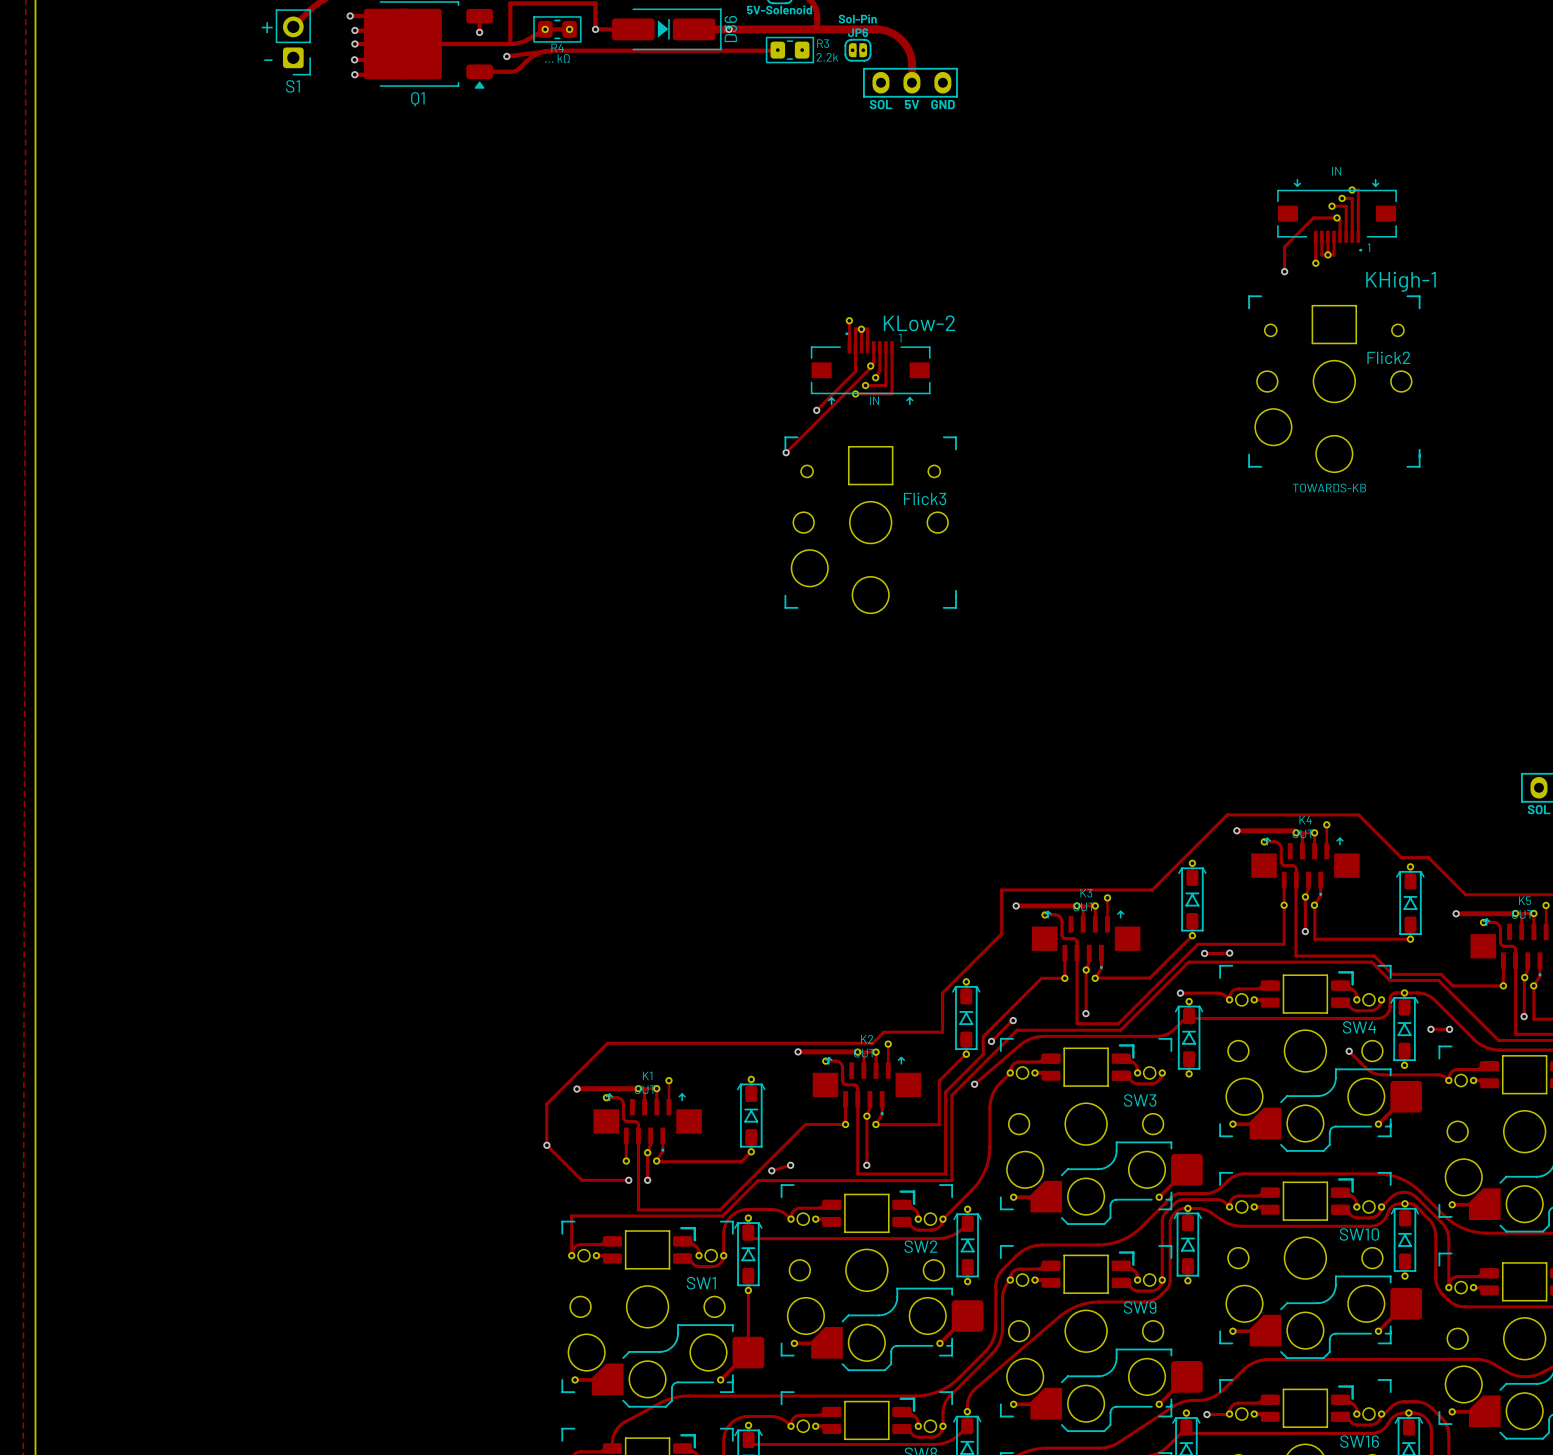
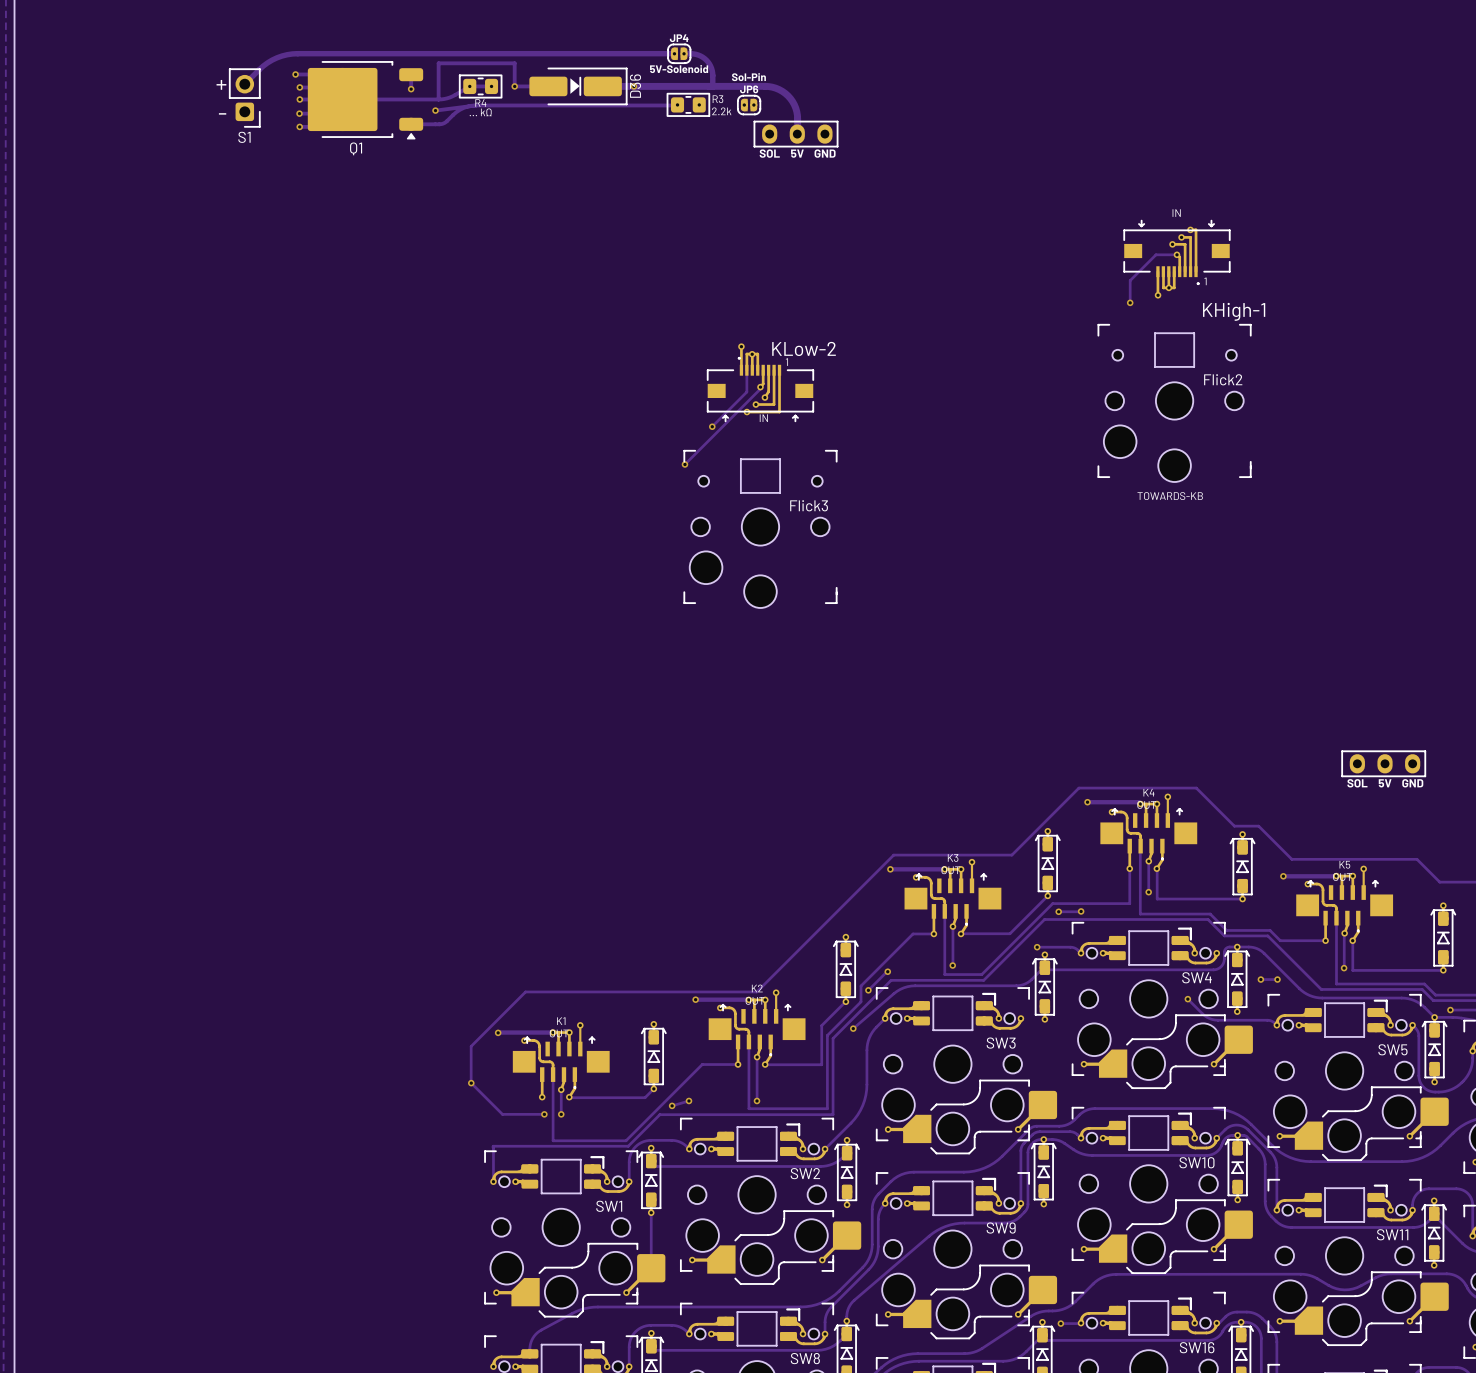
track: (1019, 889) (1001, 889) (1001, 933) (942, 993) (942, 1032) (883, 1032) (872, 1043) (866, 1043) -> (893, 855) (756, 991)

